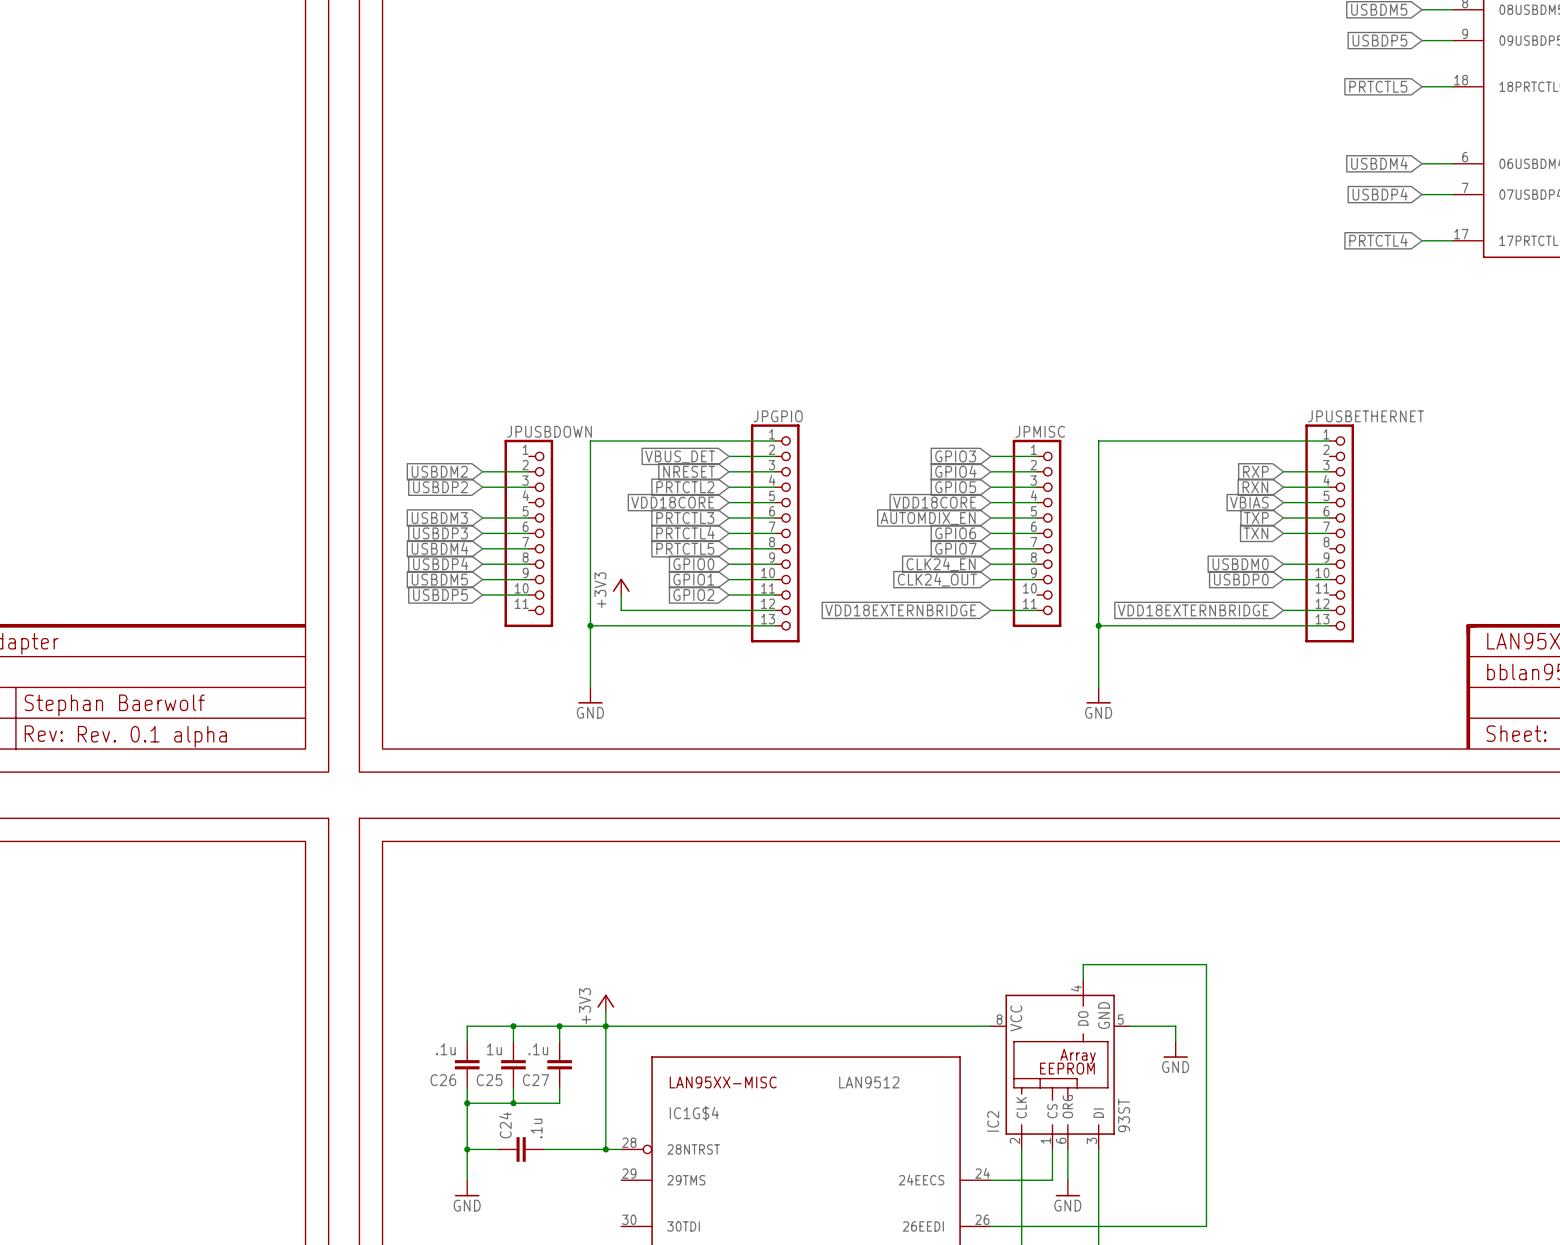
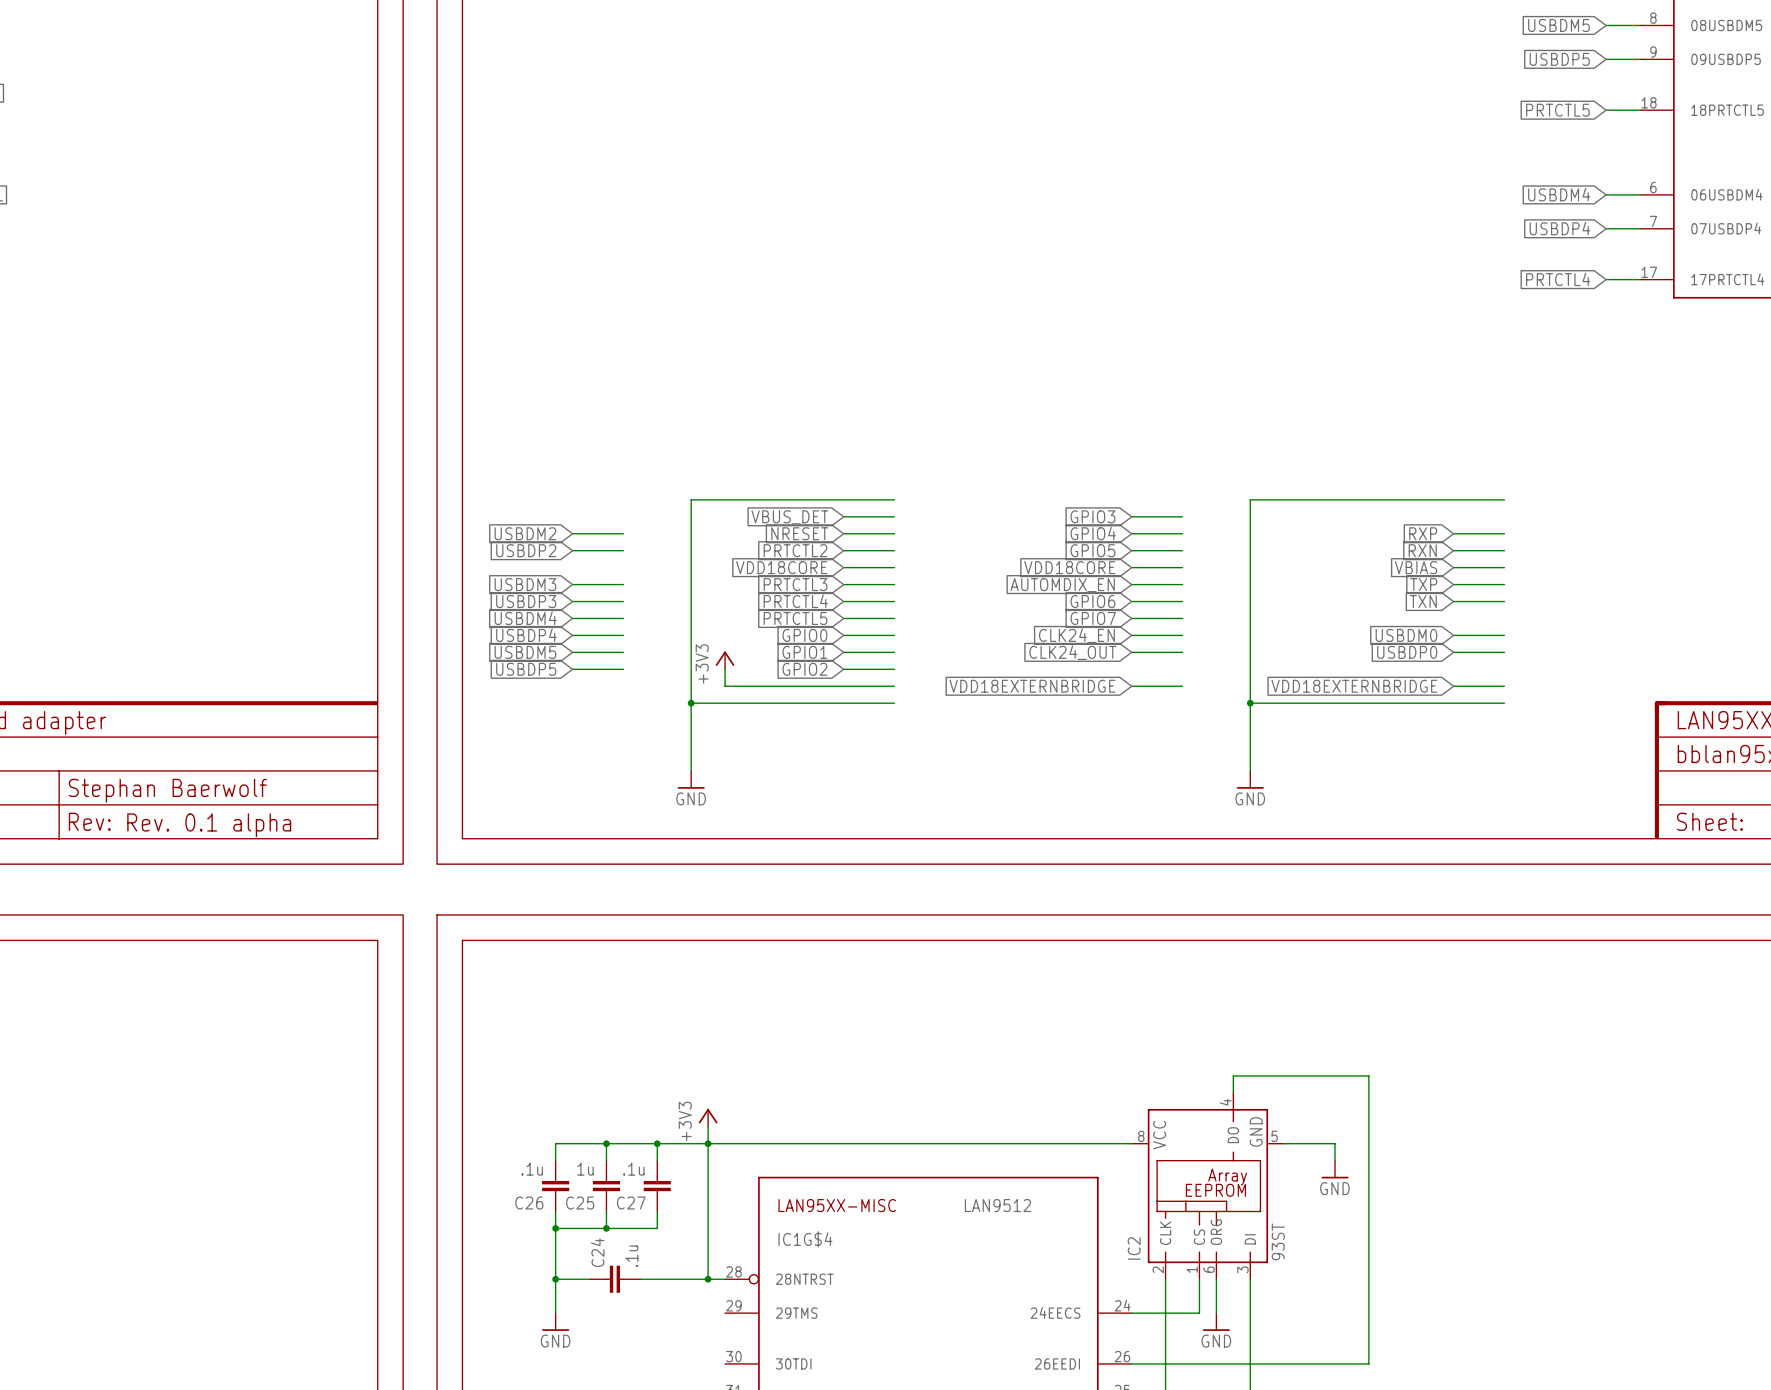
JPUSBDOWN: (528, 533) -> none
JPGPIO: (775, 533) -> none
JPMISC: (1037, 533) -> none
JPUSBETHERNET: (1329, 533) -> none

